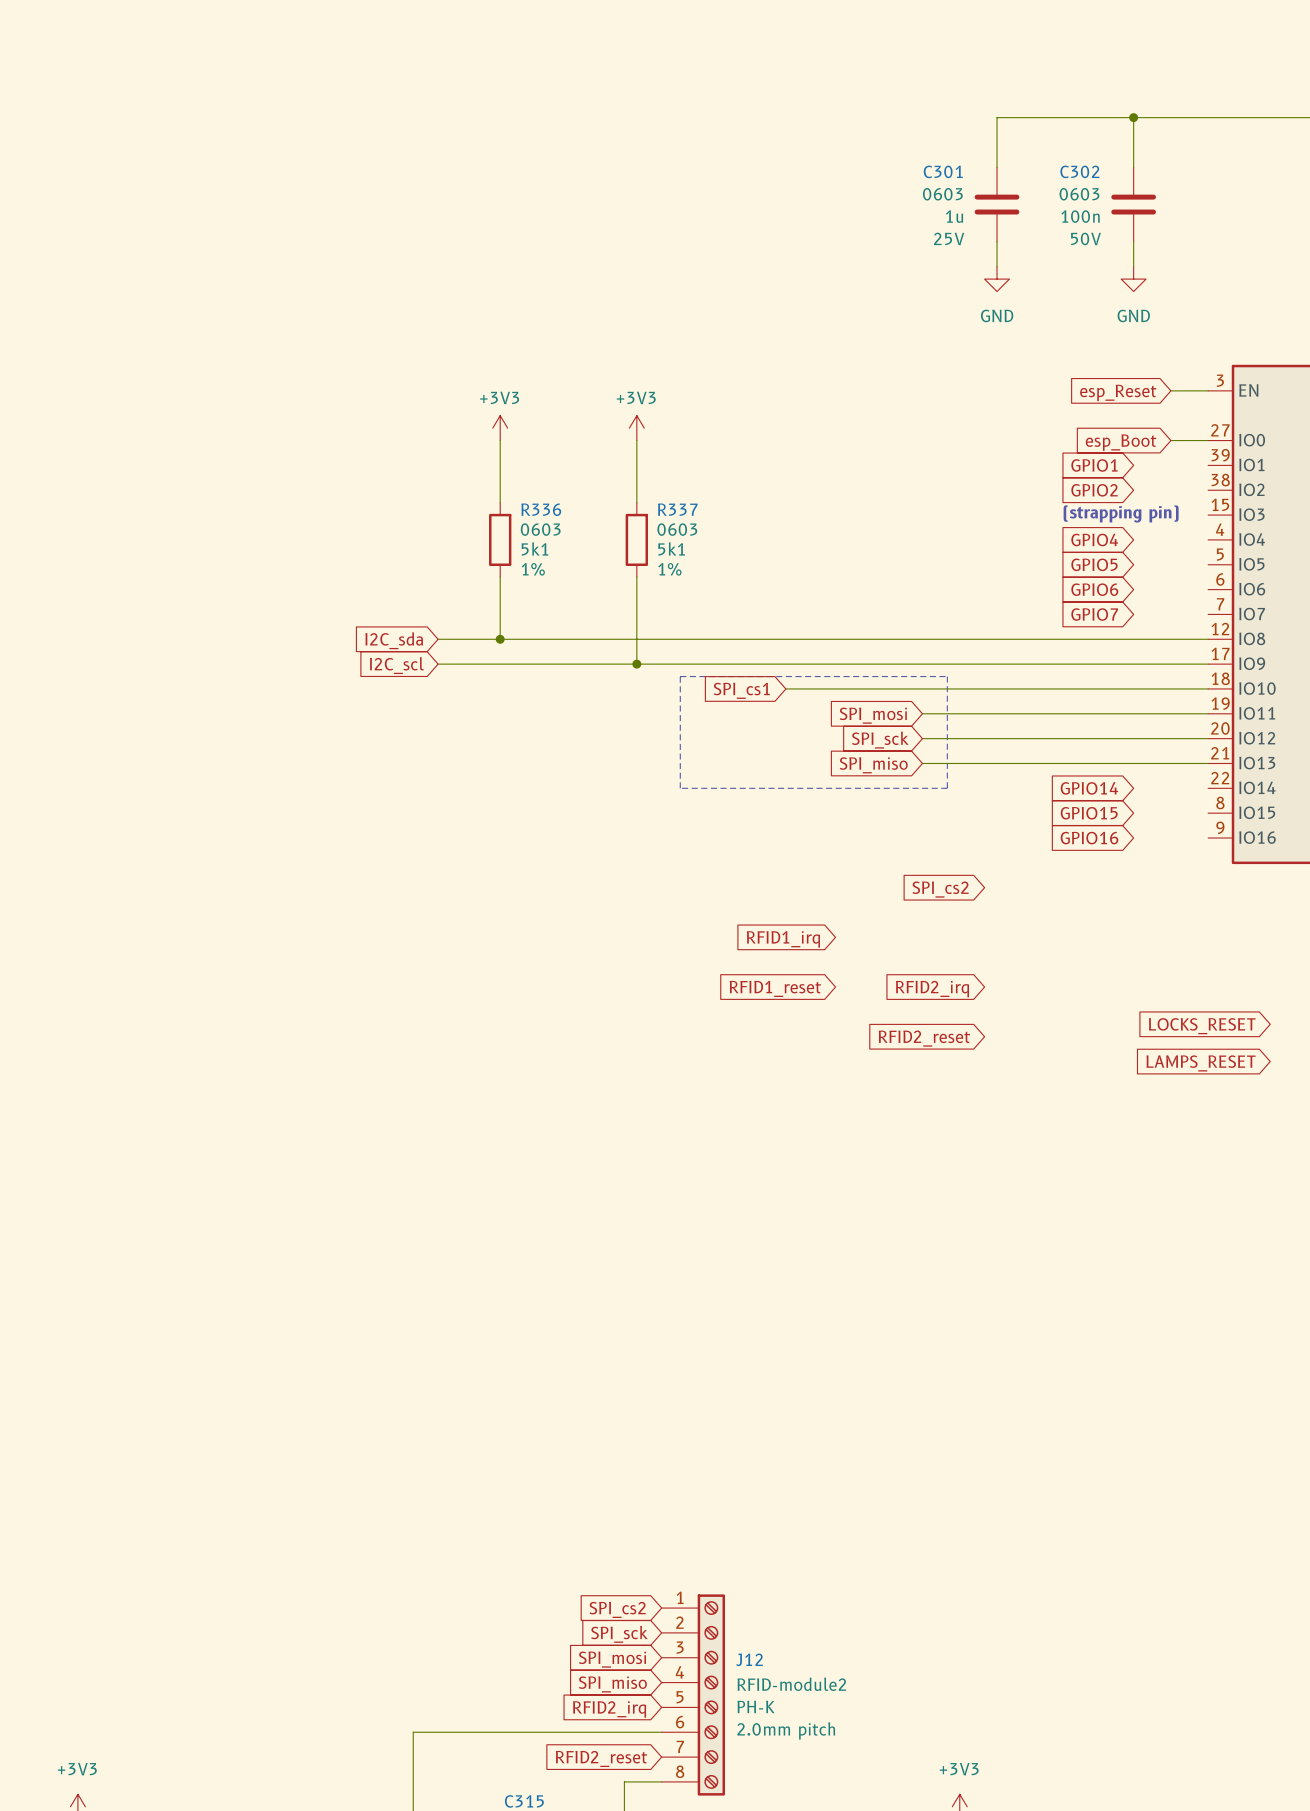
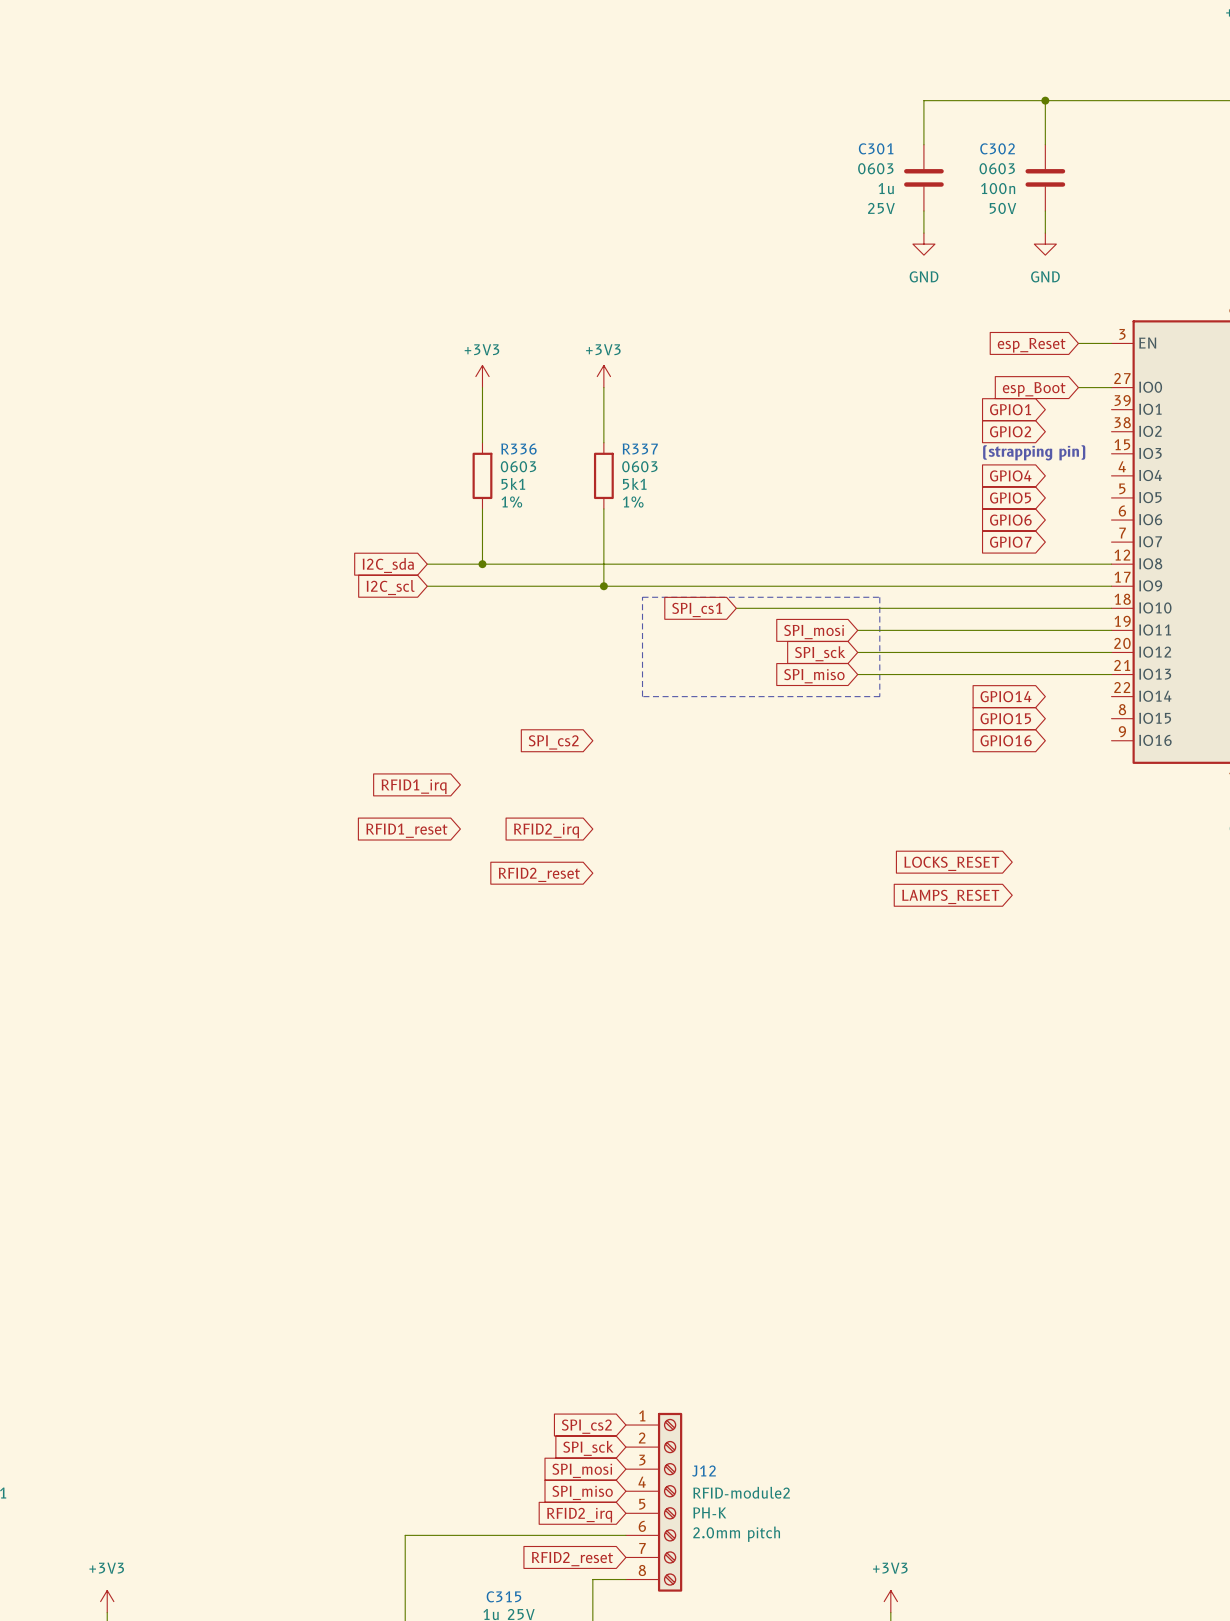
global label: none -> SPI_cs2 (553, 742)
global label: none -> RFID1_irq (414, 786)
global label: SPI_cs2 (940, 889) -> none
global label: none -> RFID1_reset (406, 830)
global label: none -> RFID2_irq (546, 830)
global label: RFID1_irq (783, 939) -> none
global label: none -> RFID2_reset (539, 874)
global label: RFID1_reset (775, 988) -> none
global label: RFID2_irq (932, 989) -> none
global label position: LOCKS_RESET (1202, 1026) -> LOCKS_RESET (951, 863)
global label: RFID2_reset (924, 1038) -> none
global label position: LAMPS_RESET (1201, 1063) -> LAMPS_RESET (950, 896)

